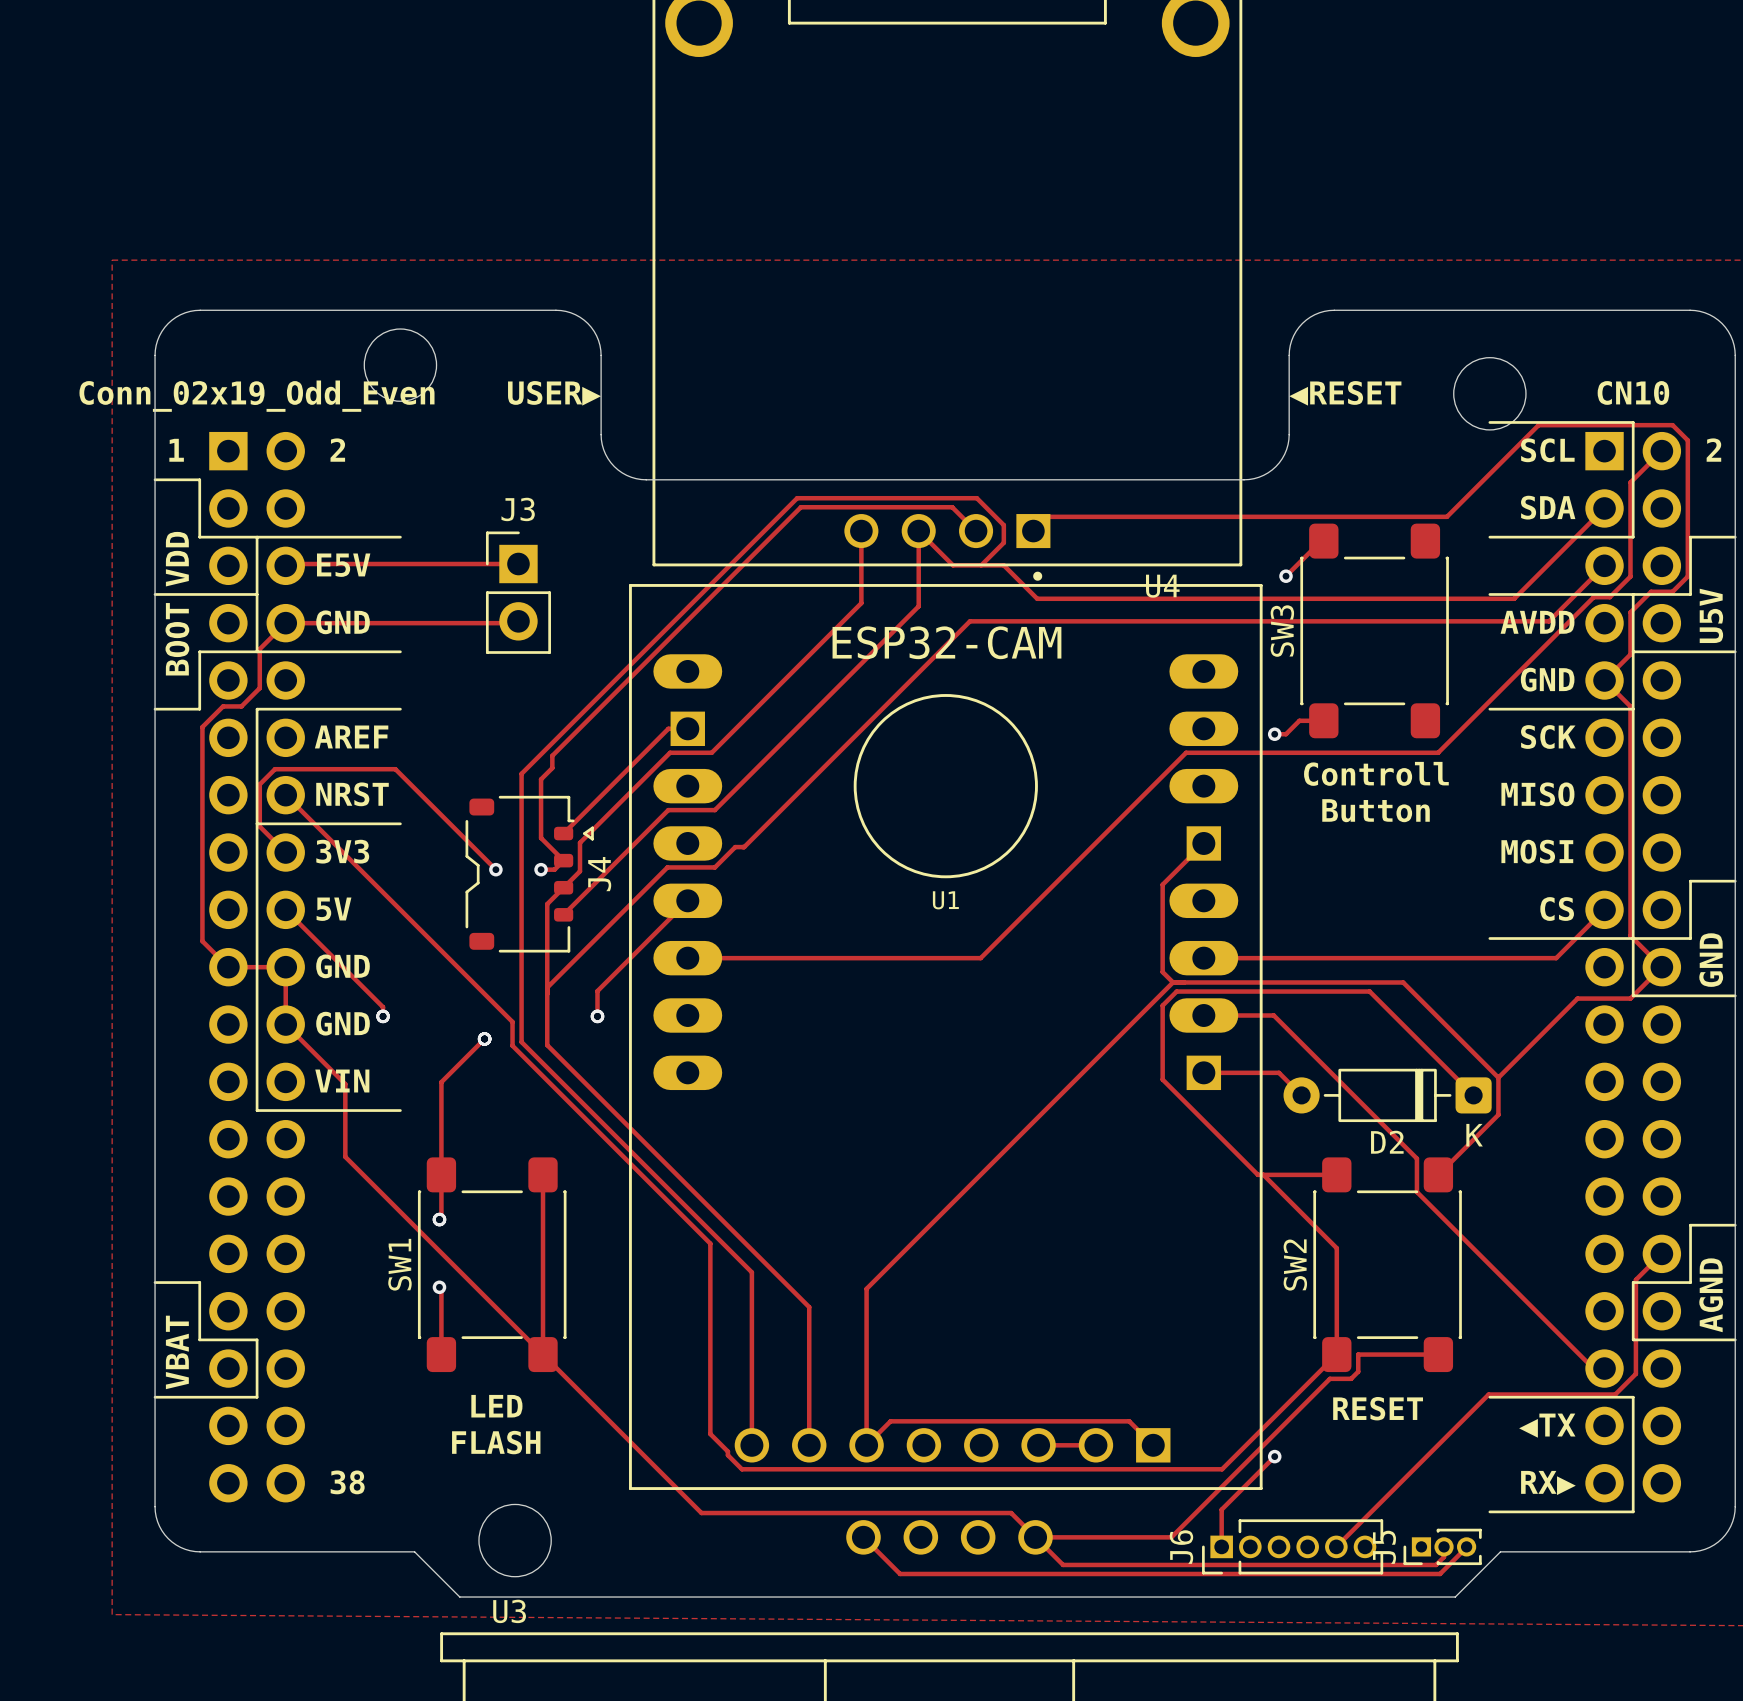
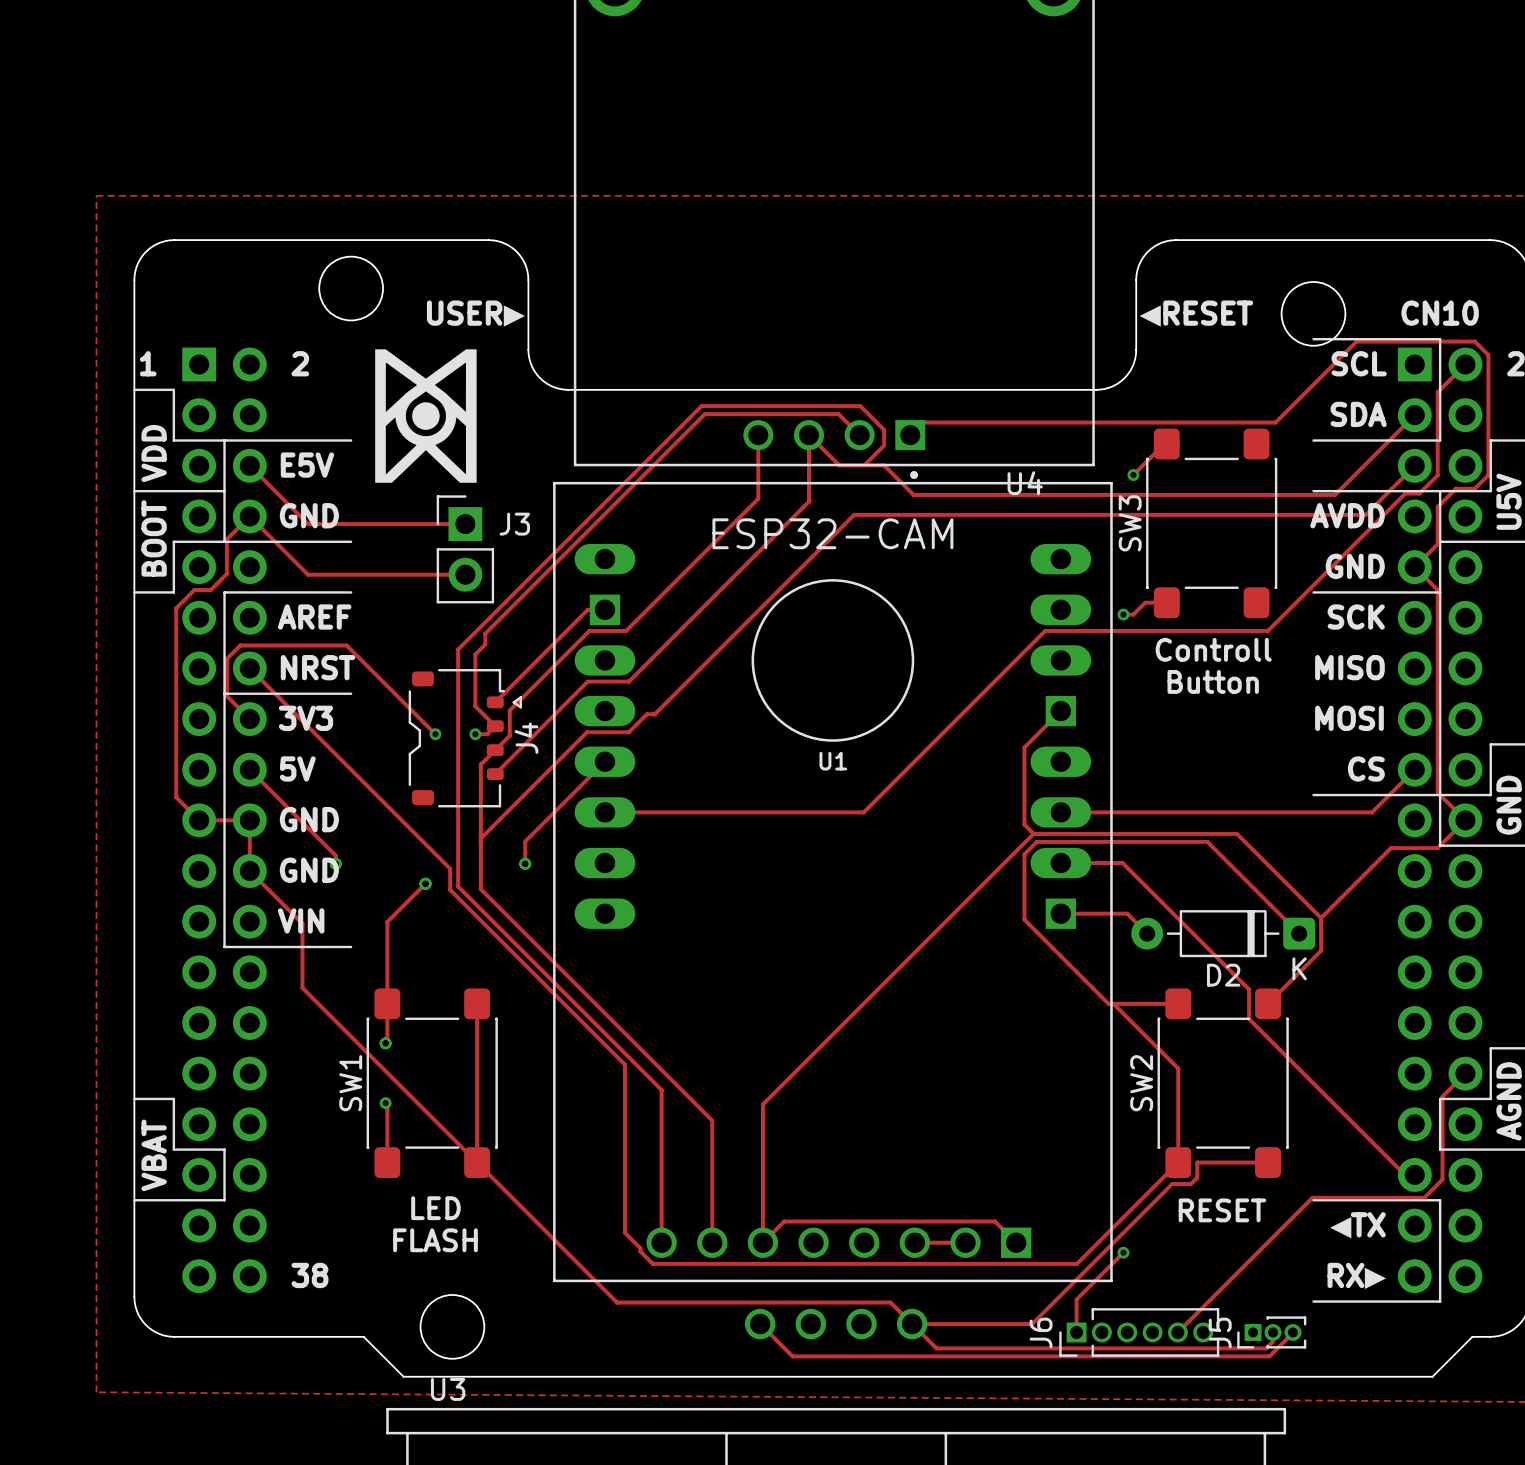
part value: Conn_02x19_Odd_Even (256, 396) -> none
drawing: none -> [375, 349, 477, 483]
J3 name position: J3 (518, 509) -> J3 (514, 524)
track: (287, 564) (518, 564) -> none
track: none -> (249, 465) (308, 524) (465, 524)
J3 position: (518, 592) -> (465, 549)
track: (518, 621) (516, 623) (285, 623) -> (465, 574) (308, 574) (249, 516)
board edge: (1669, 1551) (1500, 1551) (1455, 1597) -> (1472, 1336) (1432, 1376) (1282, 1376)

